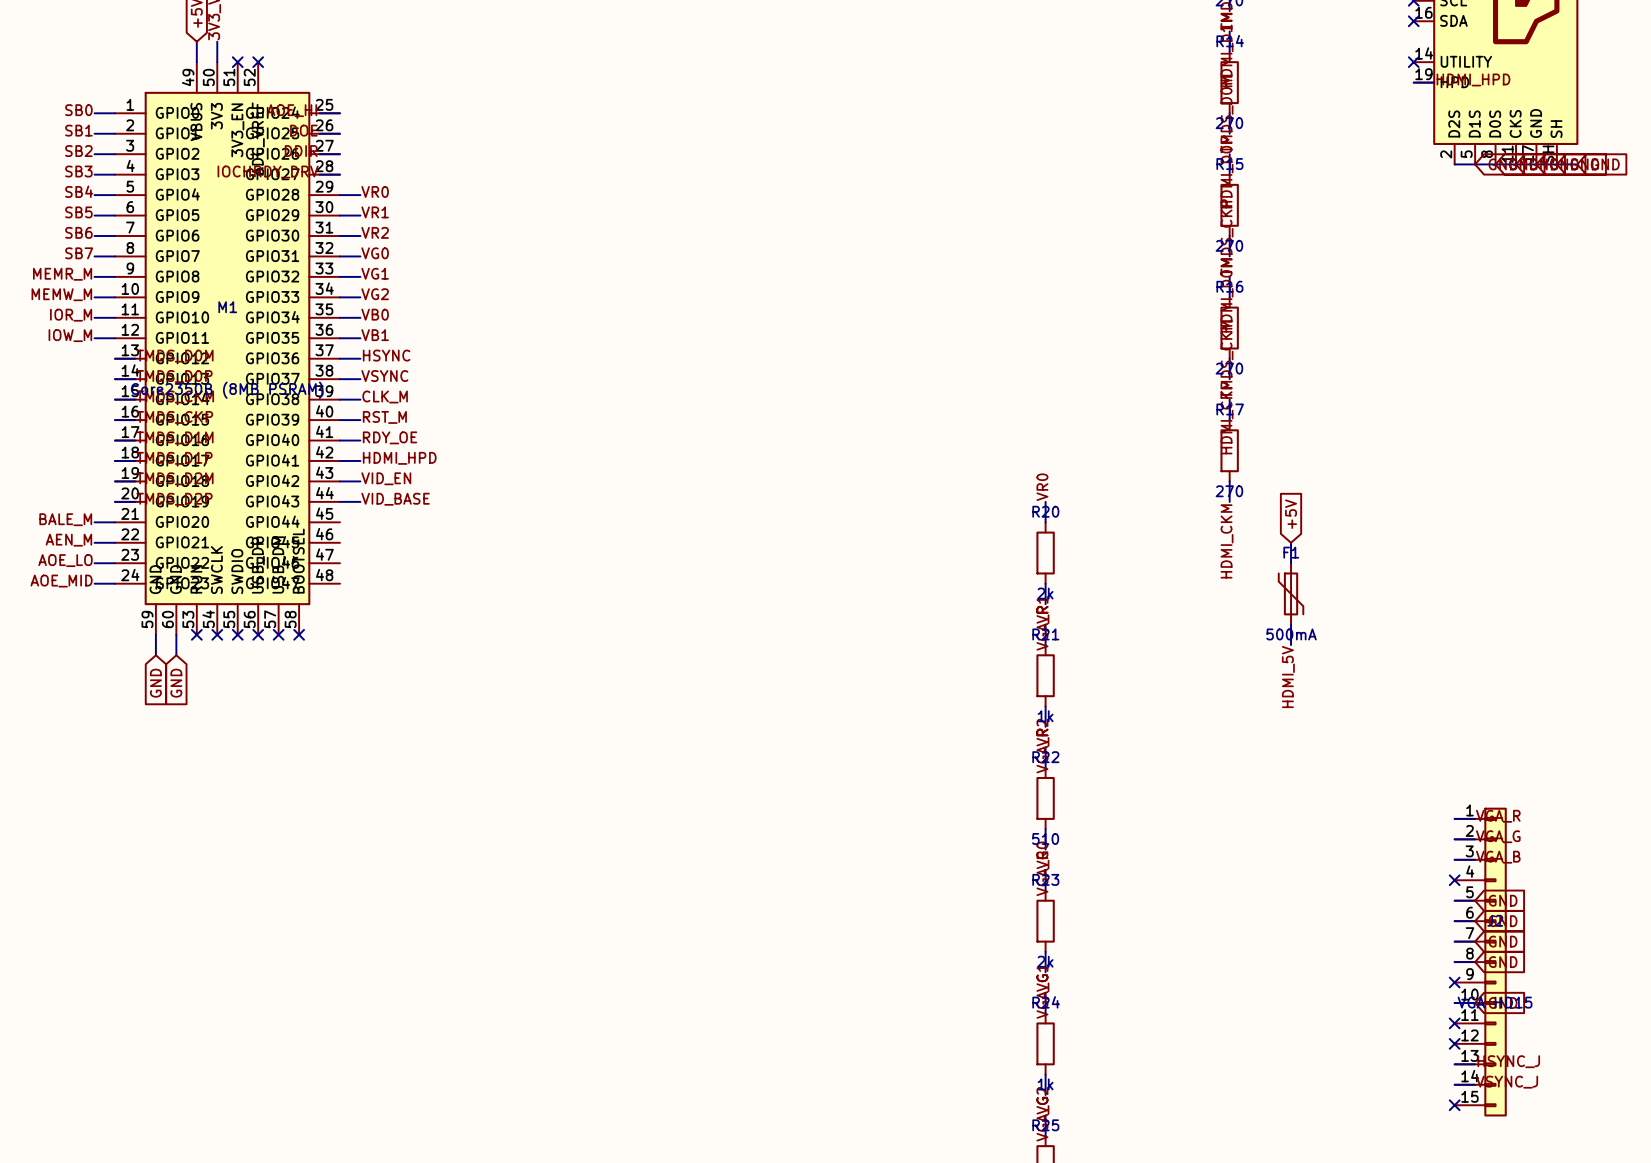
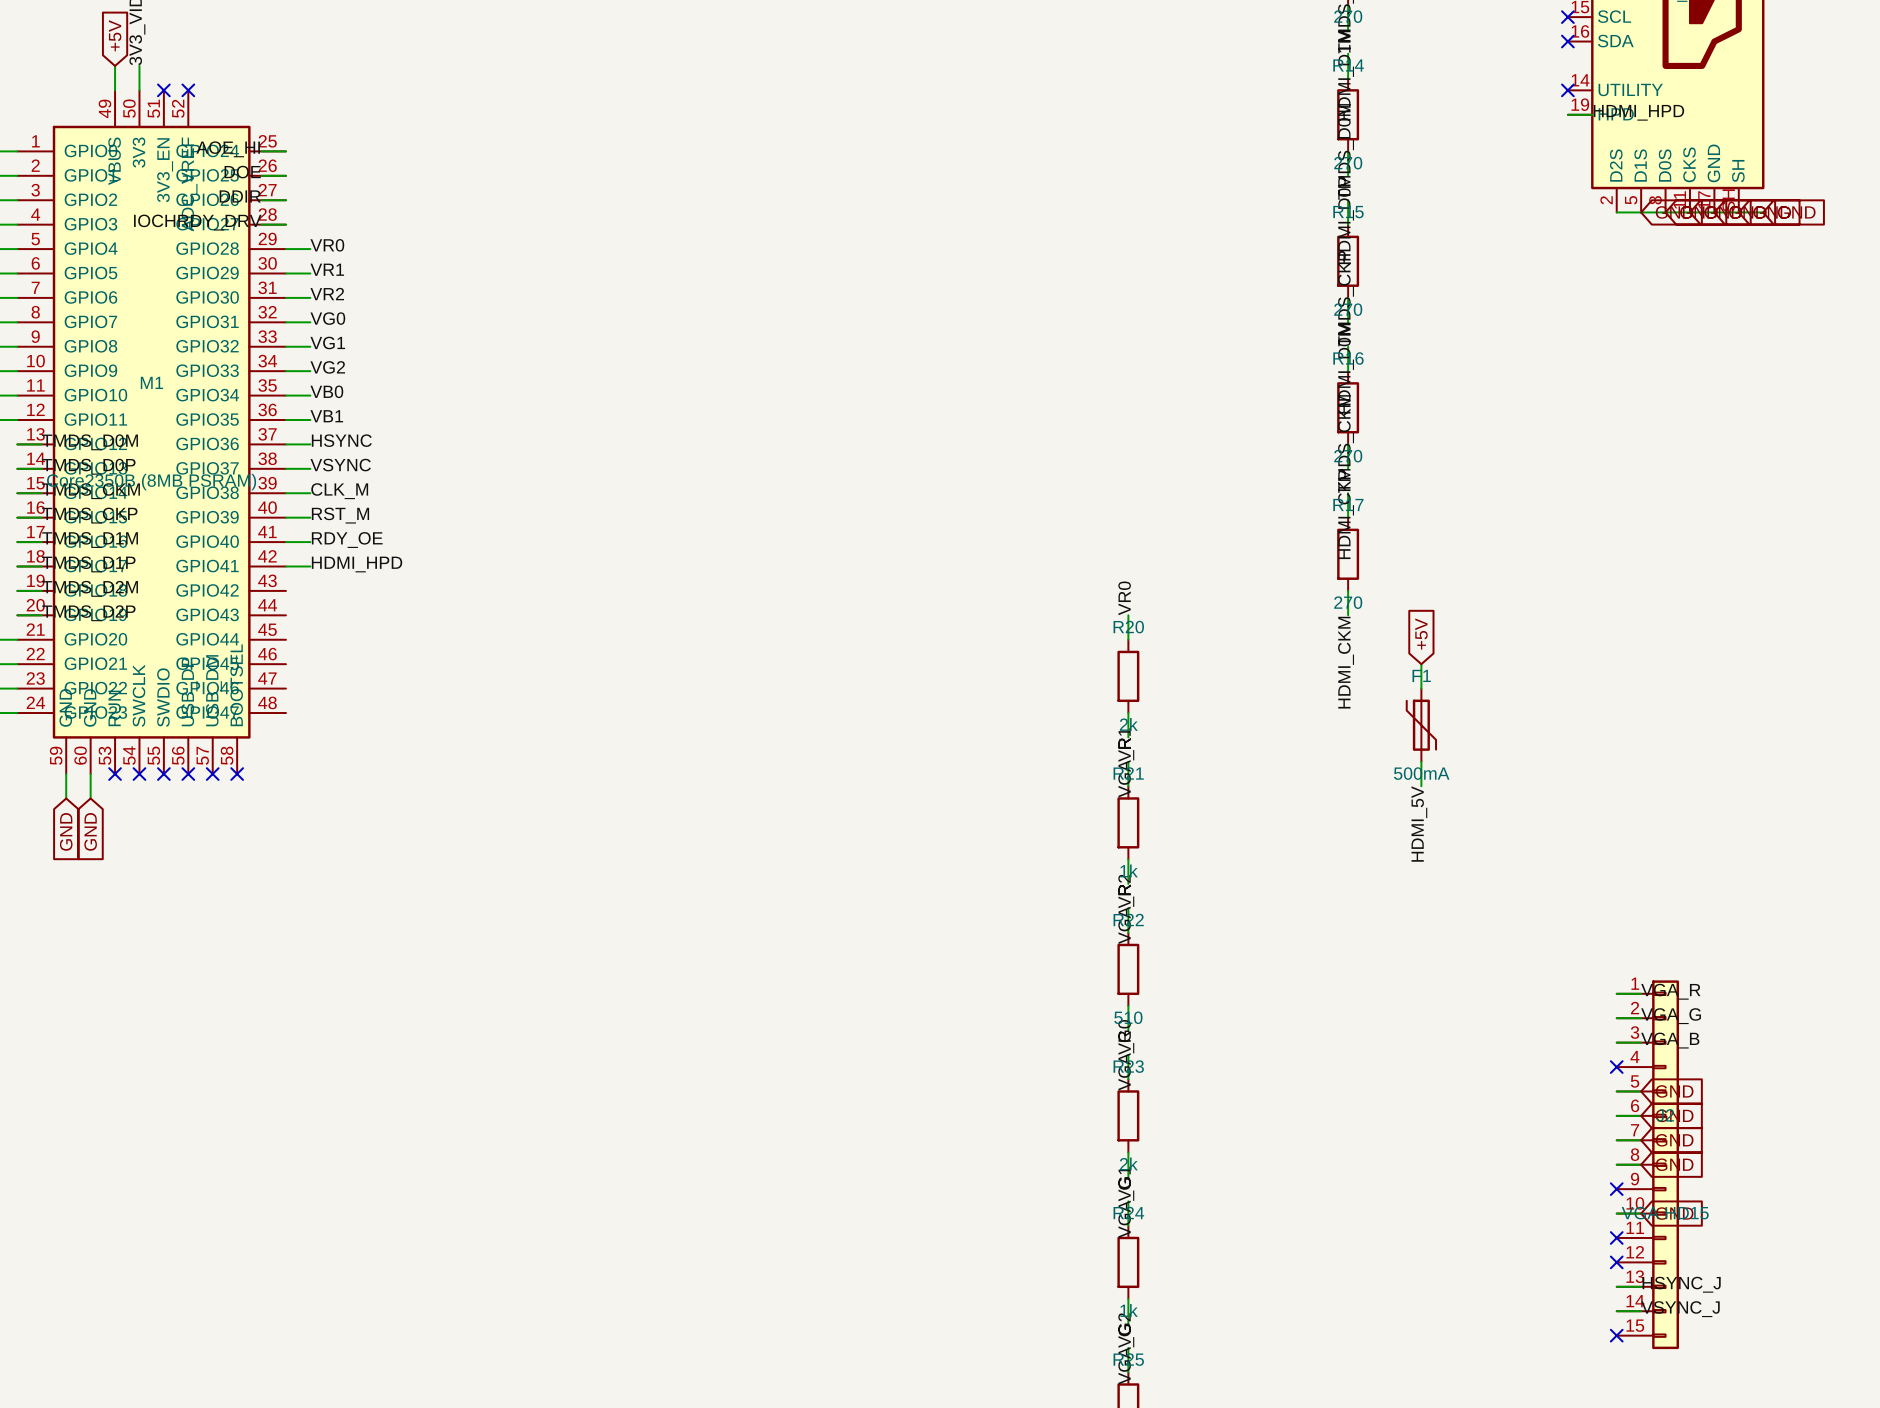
label: VID_EN (386, 478) -> none
wire: (339, 481) (360, 481) -> none
label: VID_BASE (395, 499) -> none
wire: (339, 501) (360, 501) -> none

